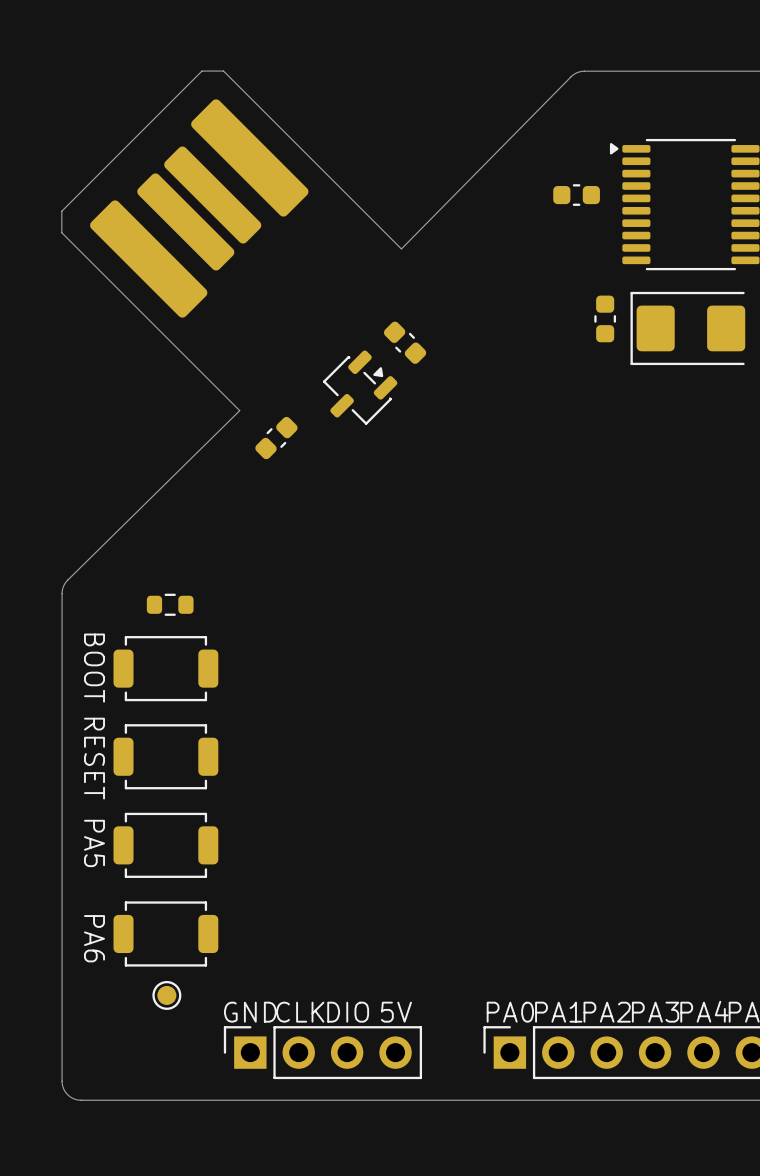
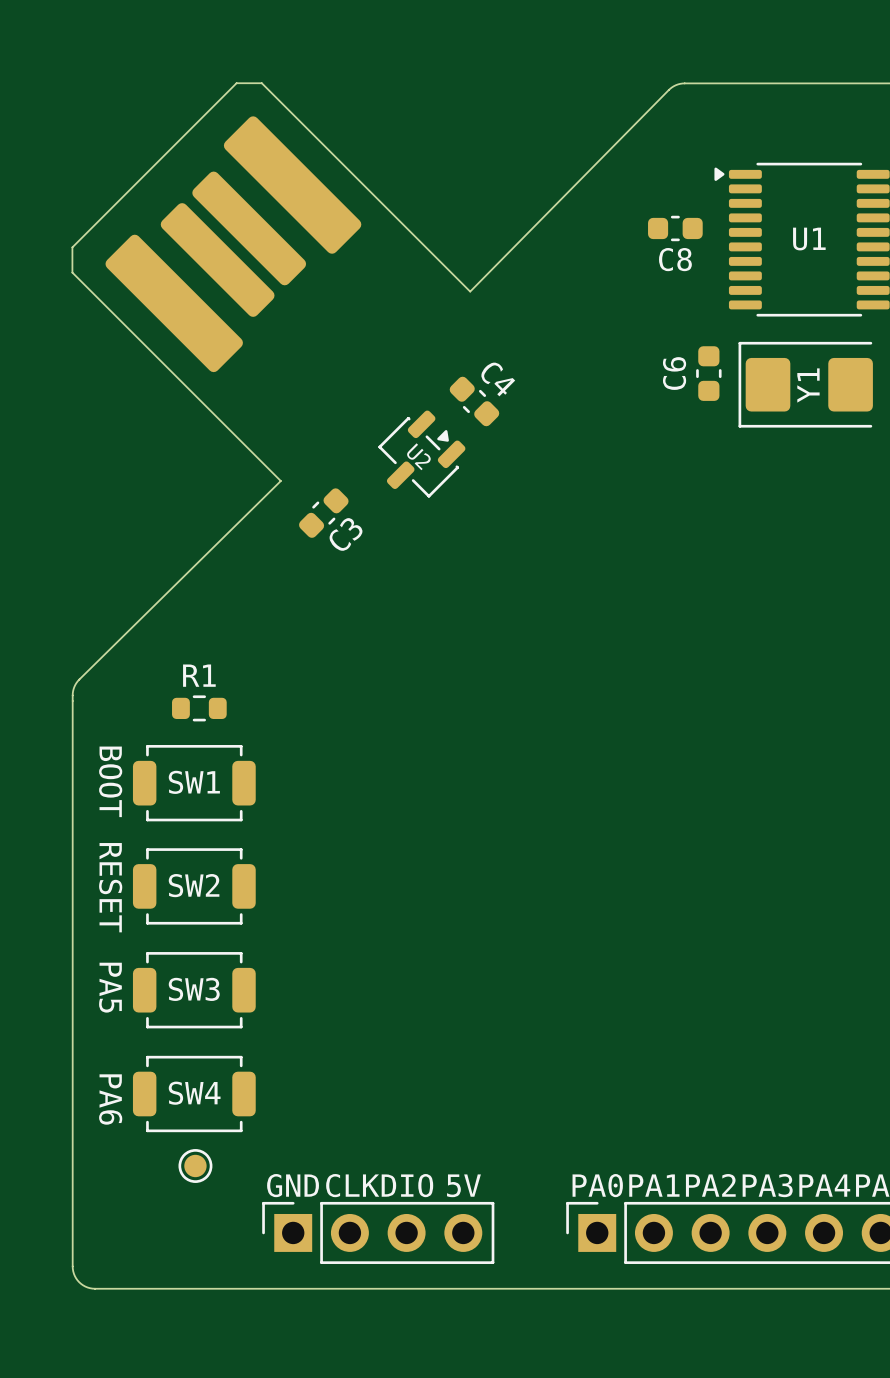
U1 name: none -> U1 (809, 239)
C8 name: none -> C8 (675, 259)
C6 name: none -> C6 (674, 373)
C4 name: none -> C4 (498, 379)
Y1 name: none -> Y1 (808, 385)
U2 name: none -> U2 (418, 456)
C3 name: none -> C3 (345, 534)
R1 name: none -> R1 (199, 675)
SW1 name: none -> SW1 (194, 782)
SW2 name: none -> SW2 (194, 885)
SW3 name: none -> SW3 (194, 989)
SW4 name: none -> SW4 (194, 1093)

